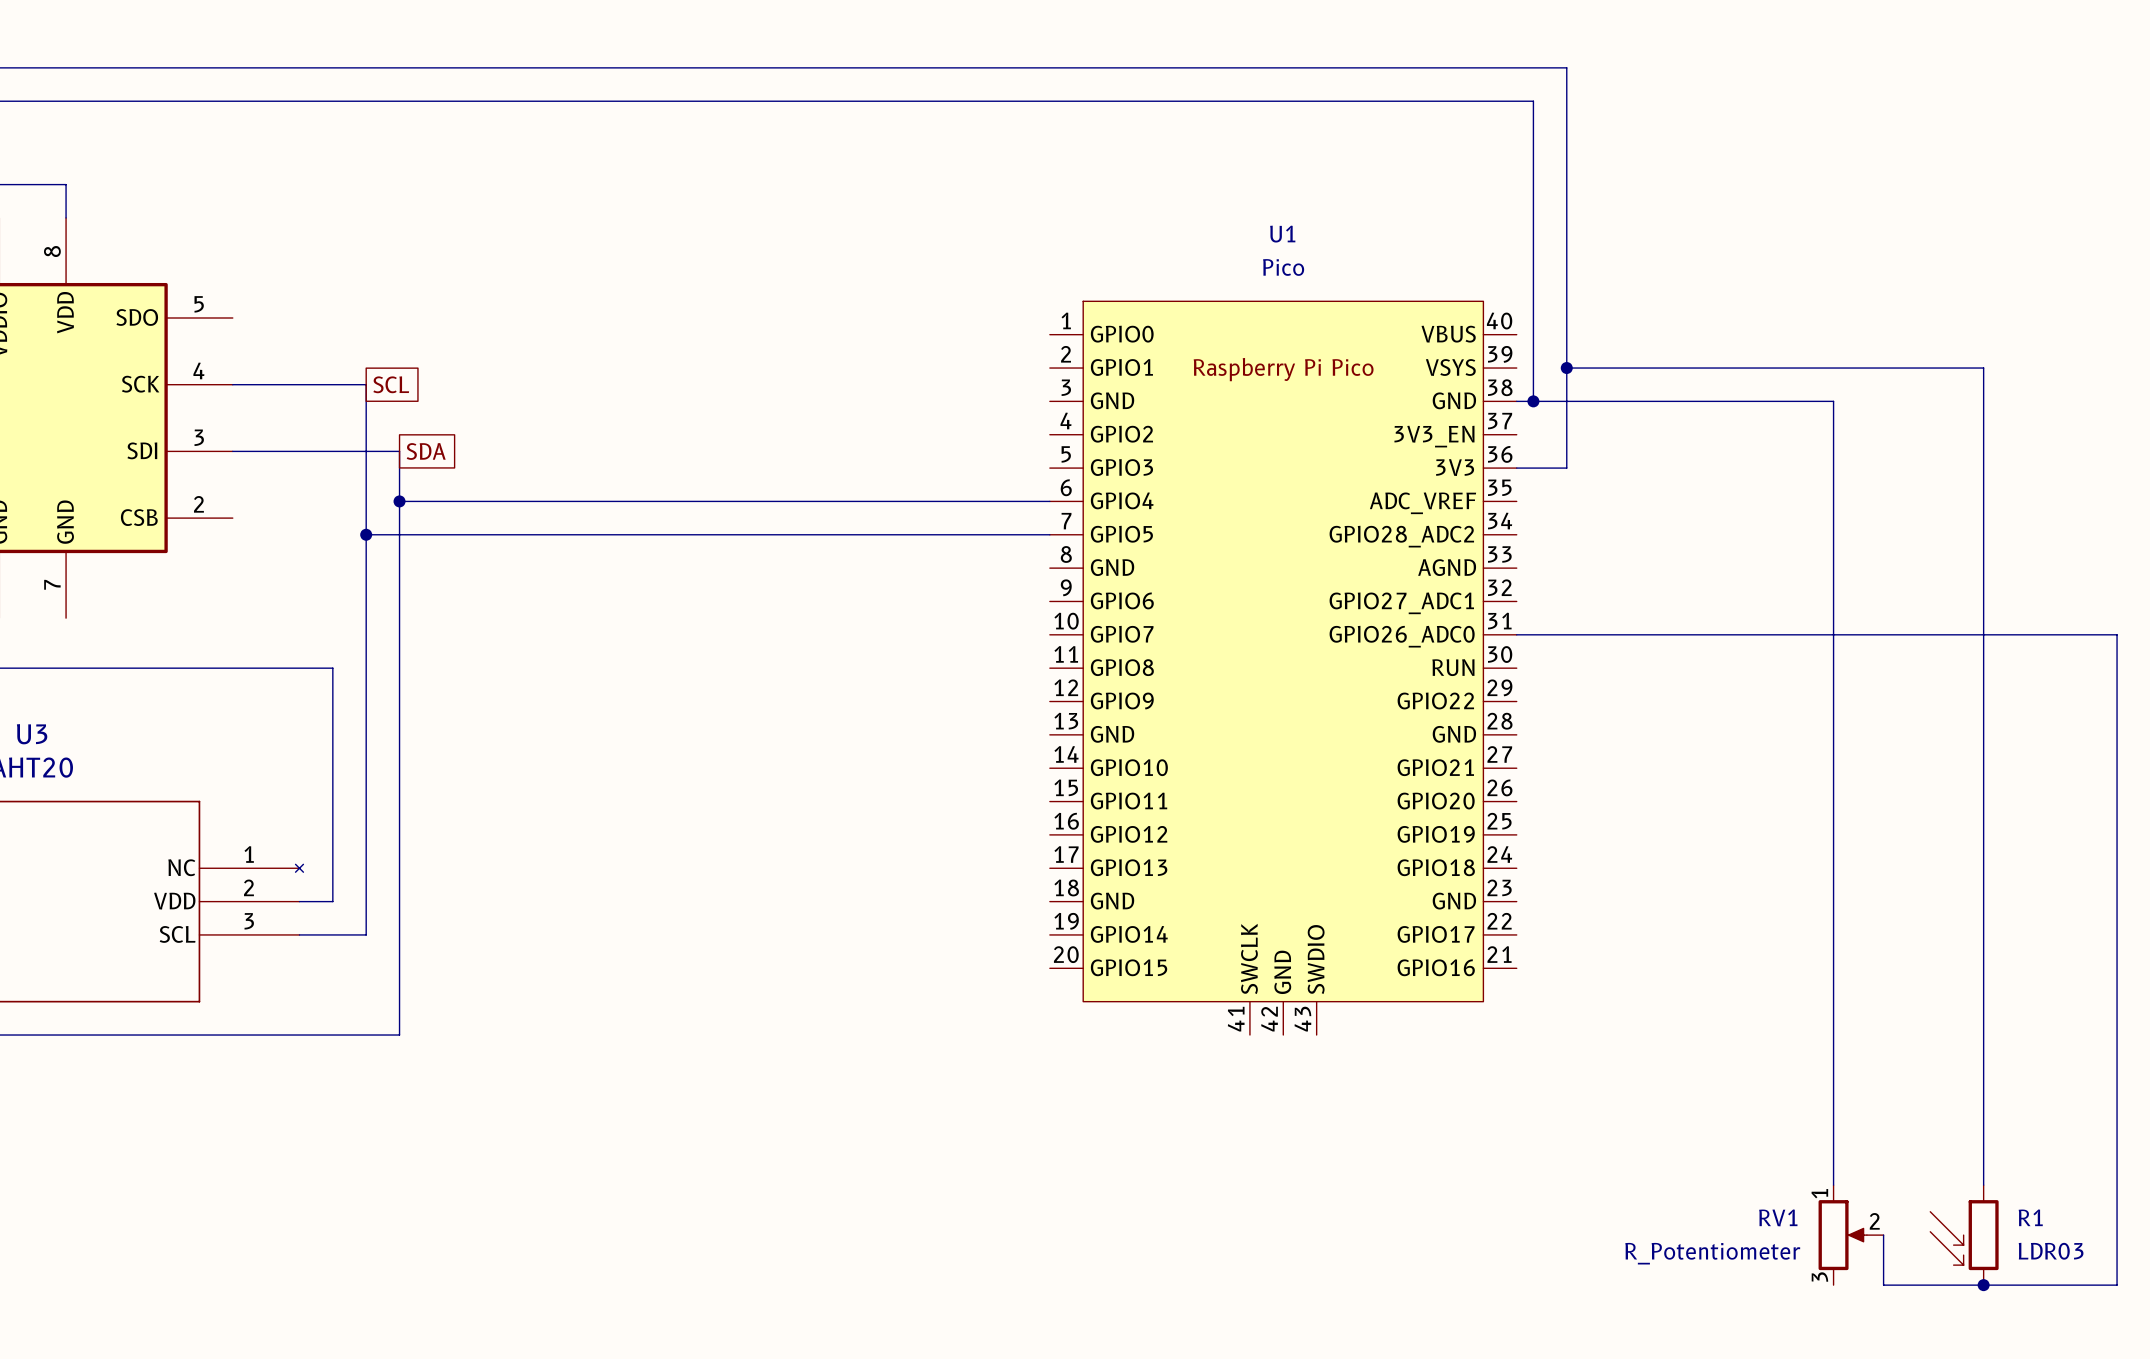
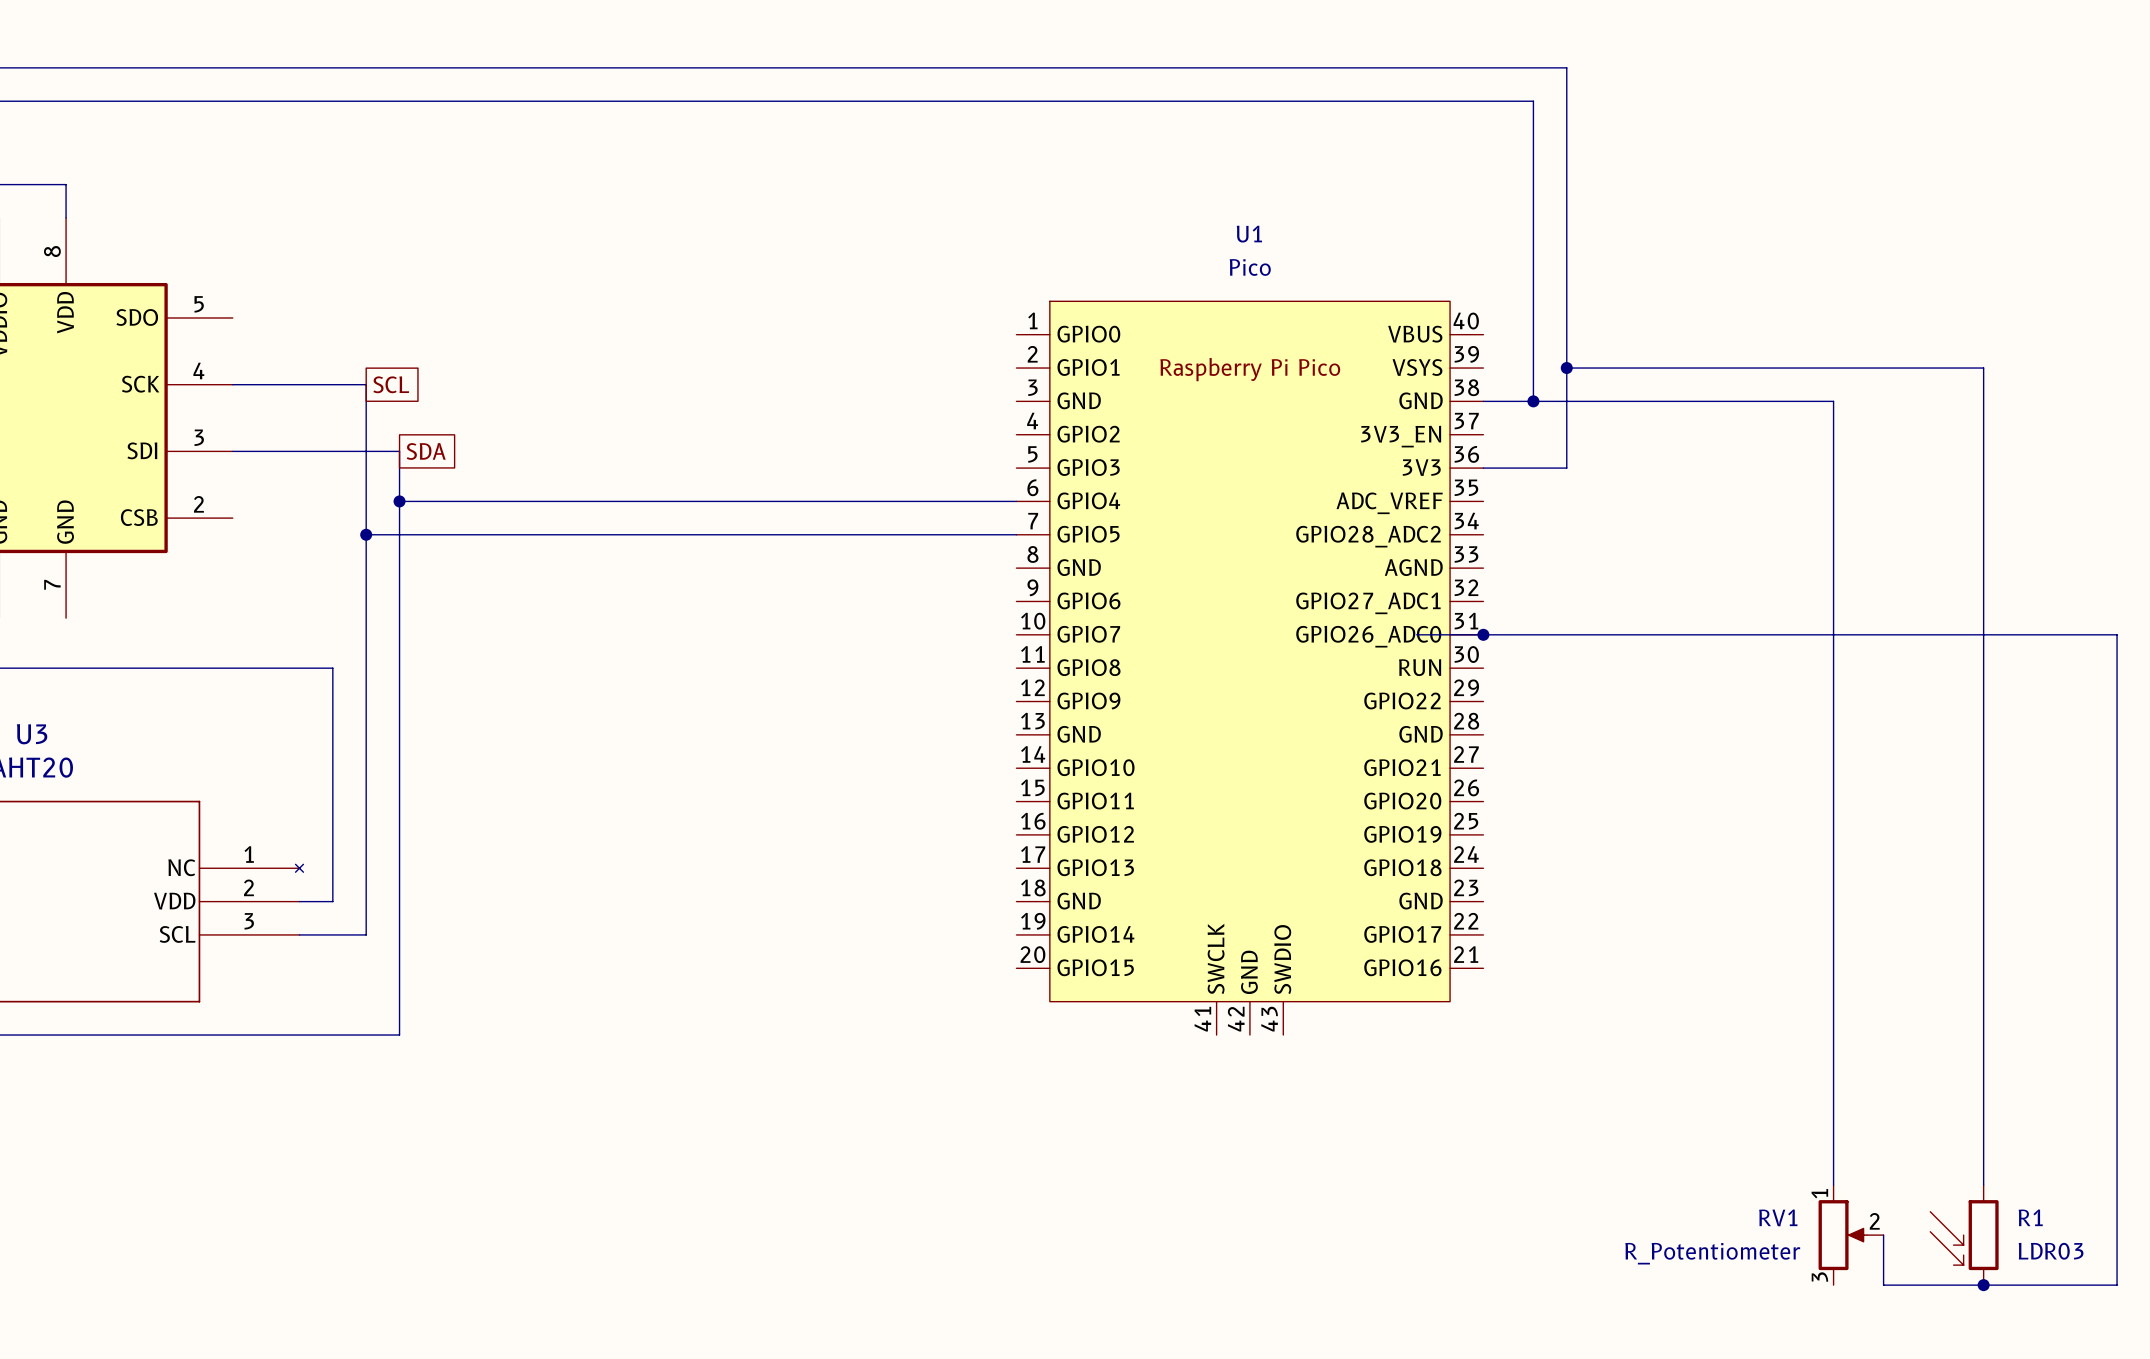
junction: none -> (1483, 634)
U1 position: (1283, 668) -> (1249, 668)

